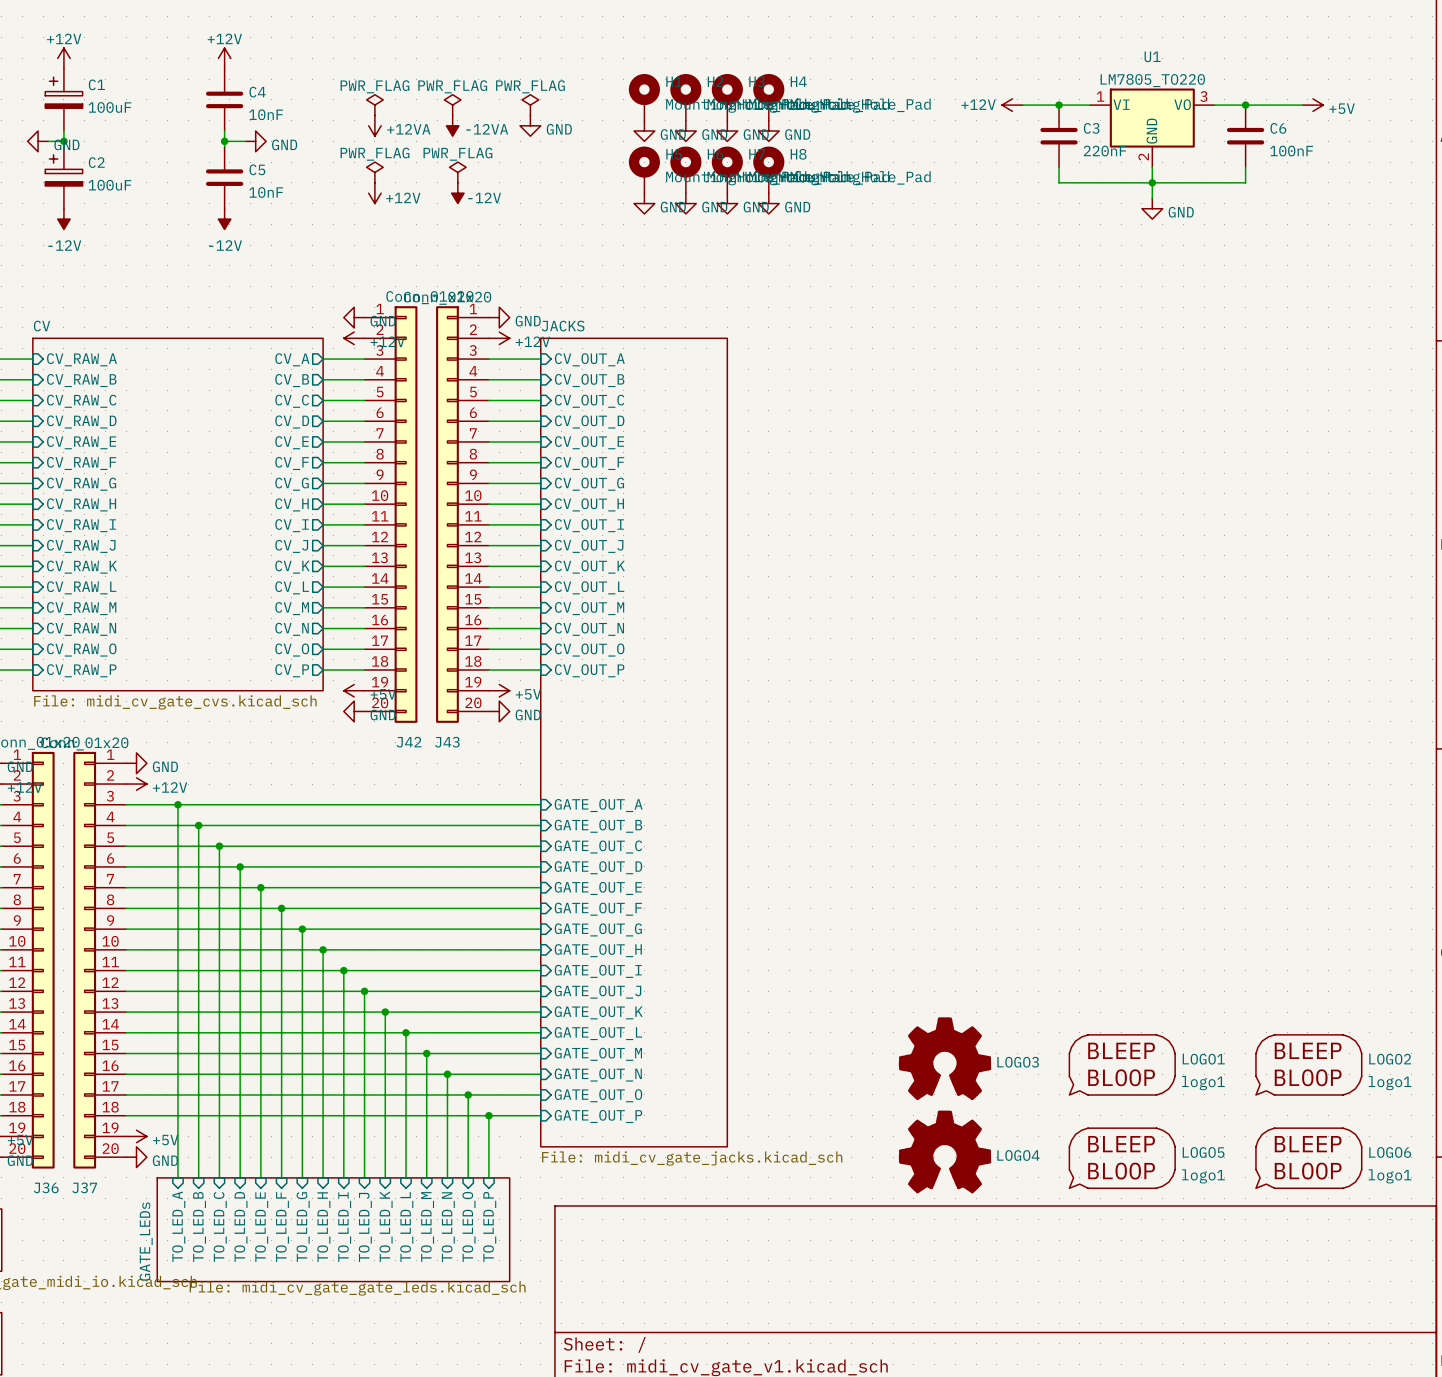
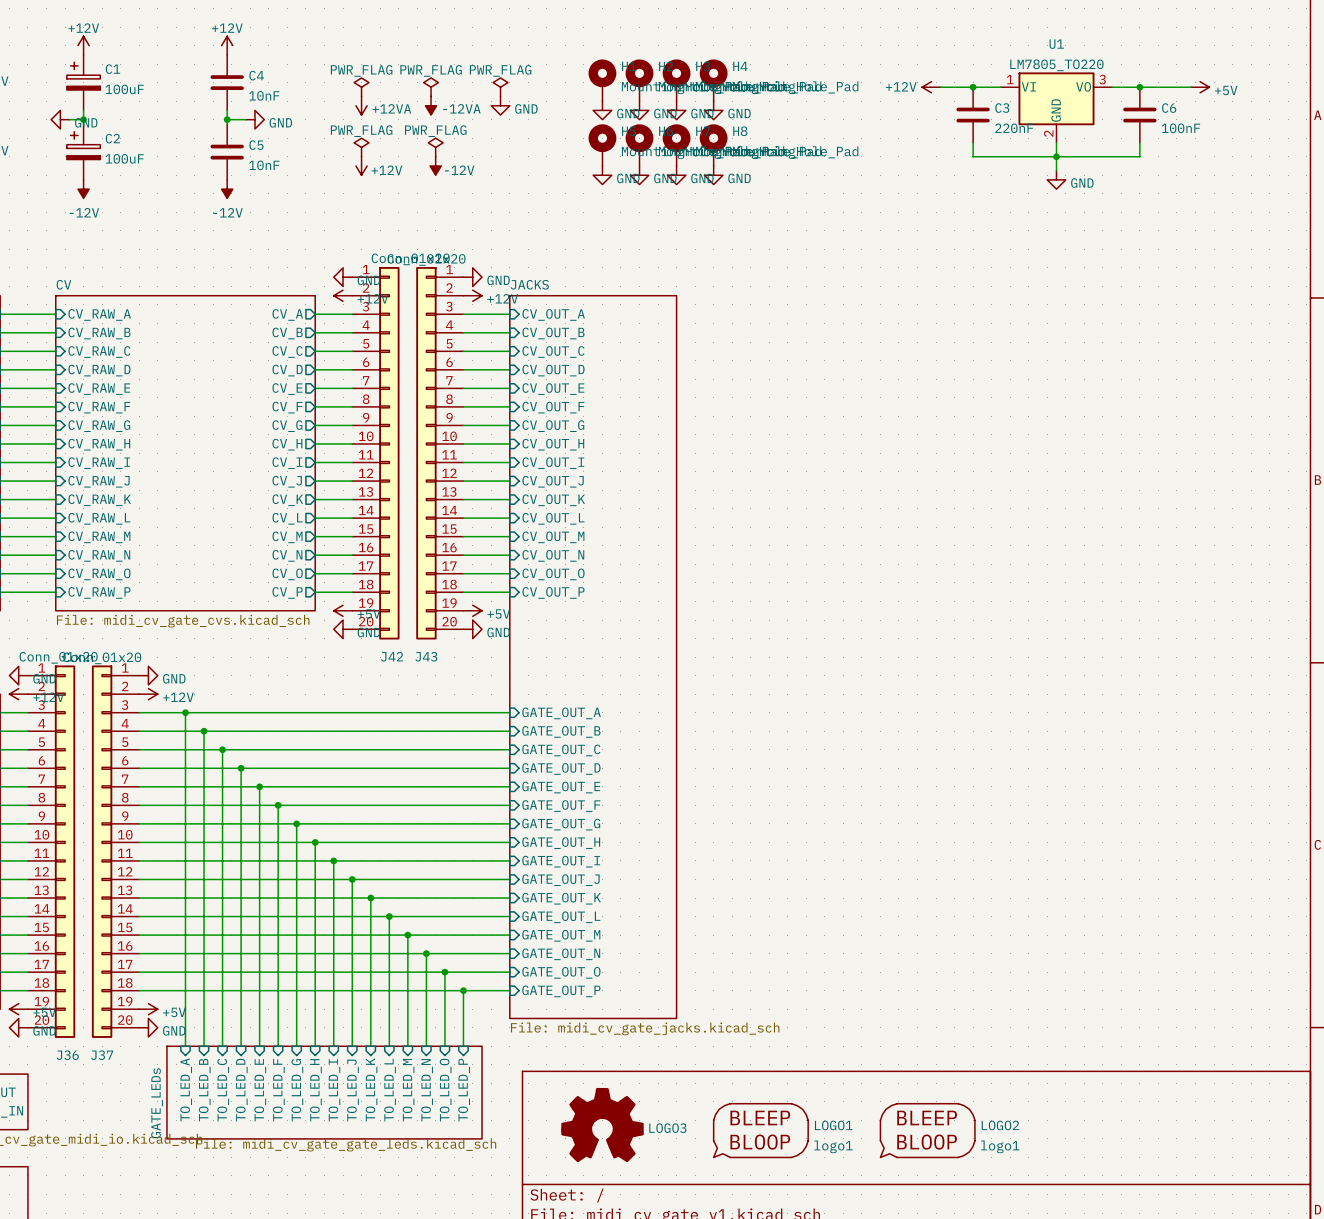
LOGO3 position: (945, 1058) -> (602, 1125)
LOGO1 position: (1122, 1067) -> (760, 1132)
LOGO2 position: (1308, 1067) -> (927, 1132)
LOGO4: (945, 1151) -> none
LOGO5: logo1 (1122, 1160) -> none
LOGO6: logo1 (1308, 1160) -> none

